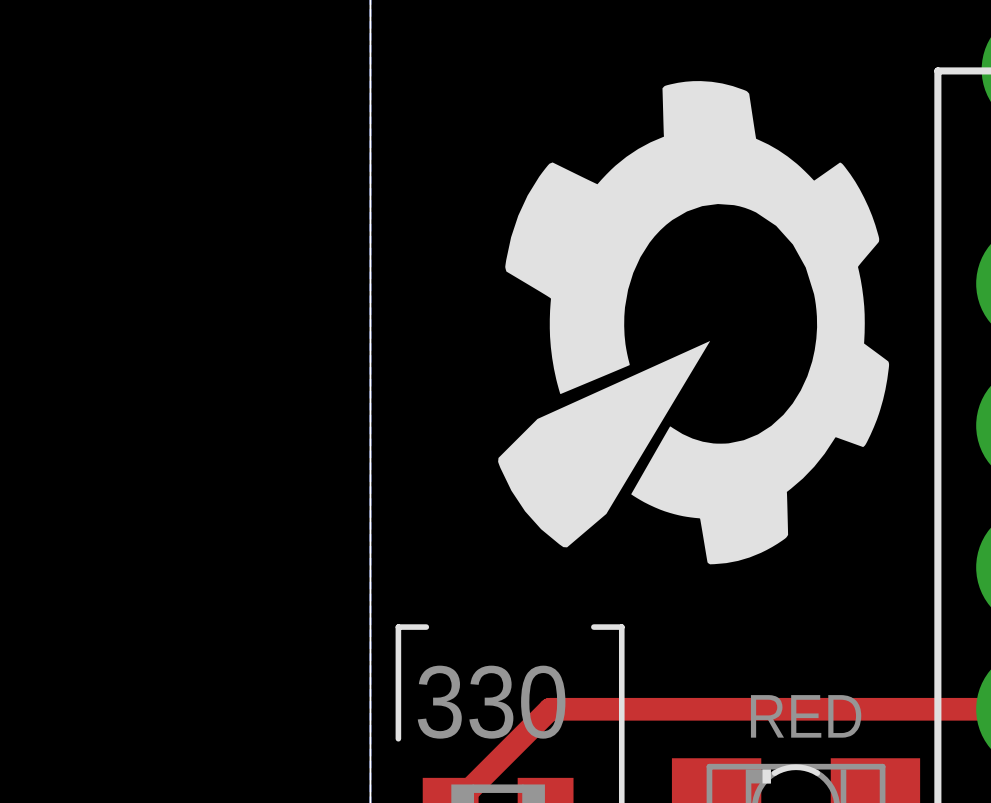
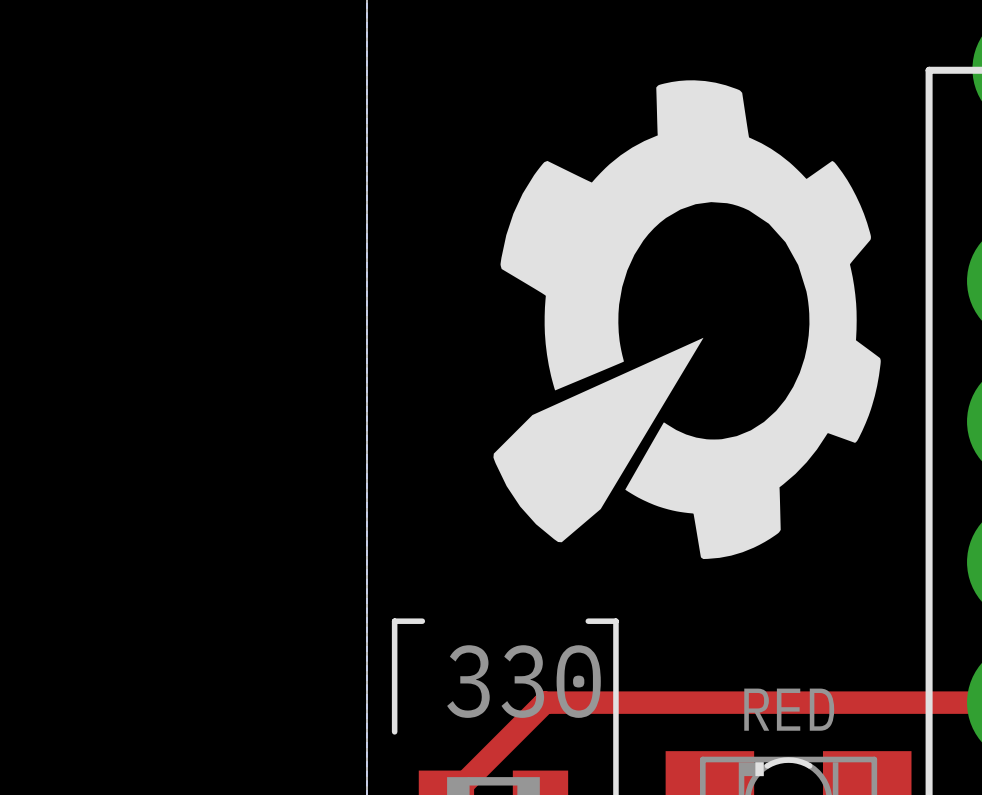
part value position: 330 (491, 702) -> 330 (523, 681)

